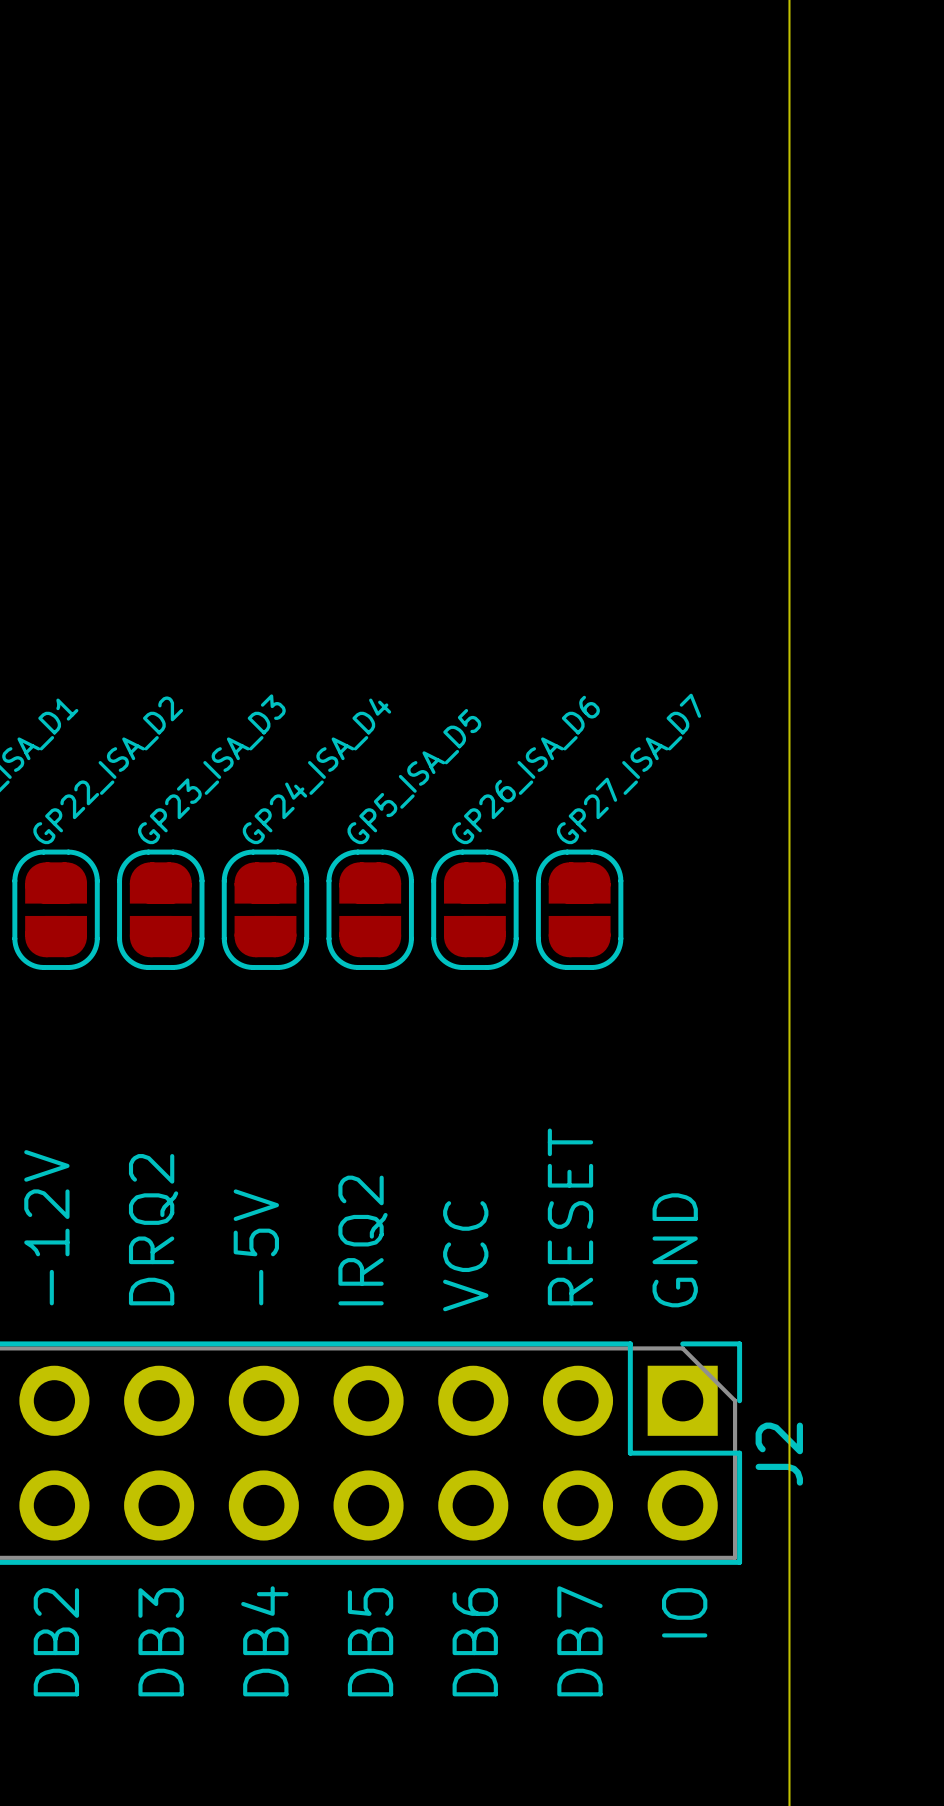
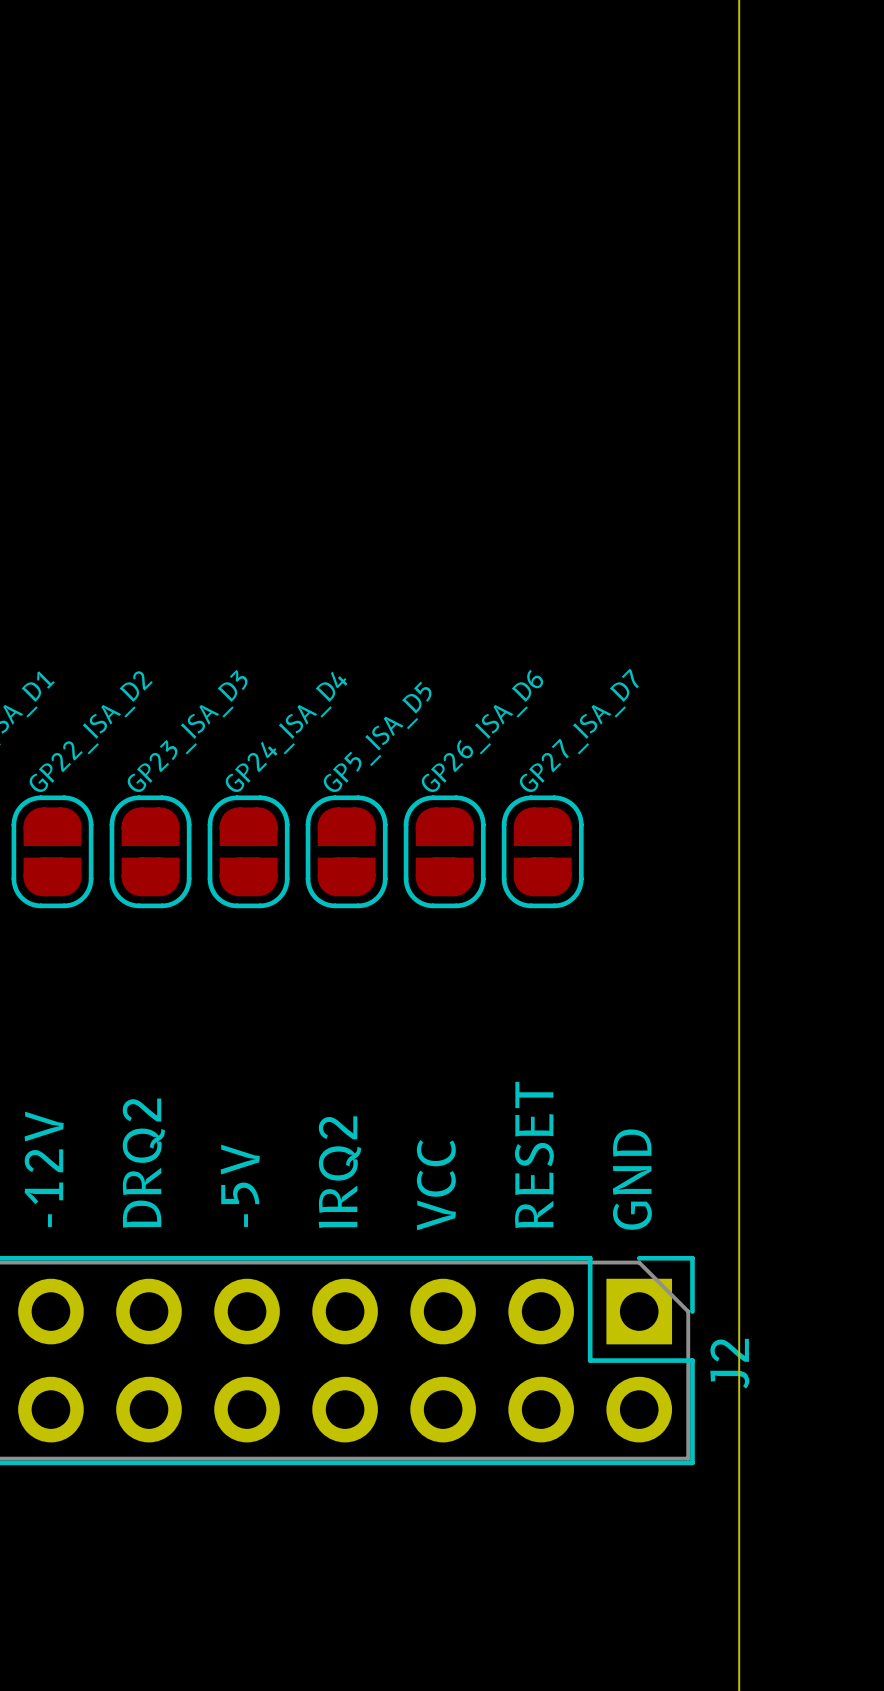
text: IO (684, 1612) -> none
text: DB4 (264, 1641) -> none
text: DB7 (579, 1641) -> none
text: DB2 (56, 1642) -> none
text: DB3 (161, 1642) -> none
text: DB5 (370, 1642) -> none
text: DB6 (475, 1642) -> none

